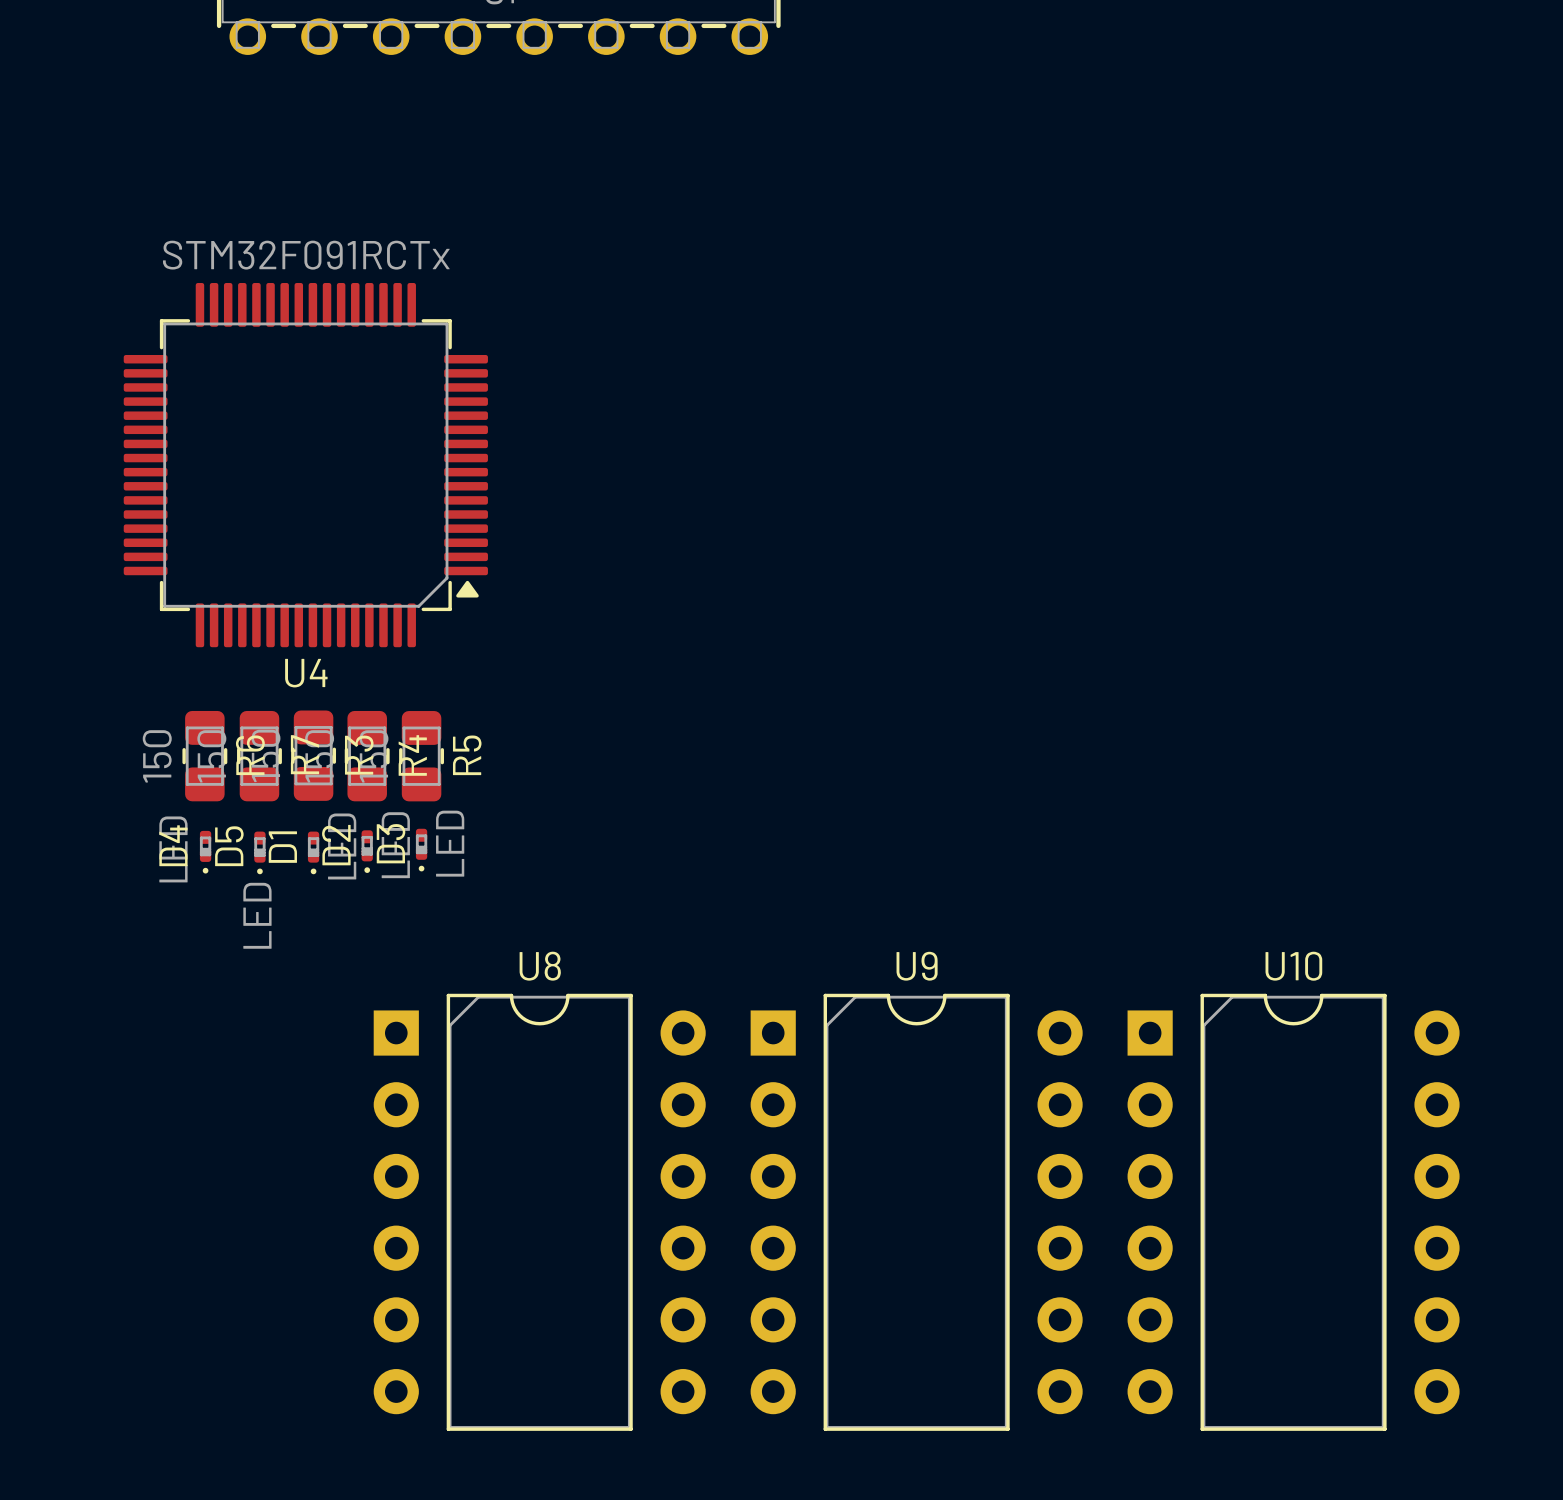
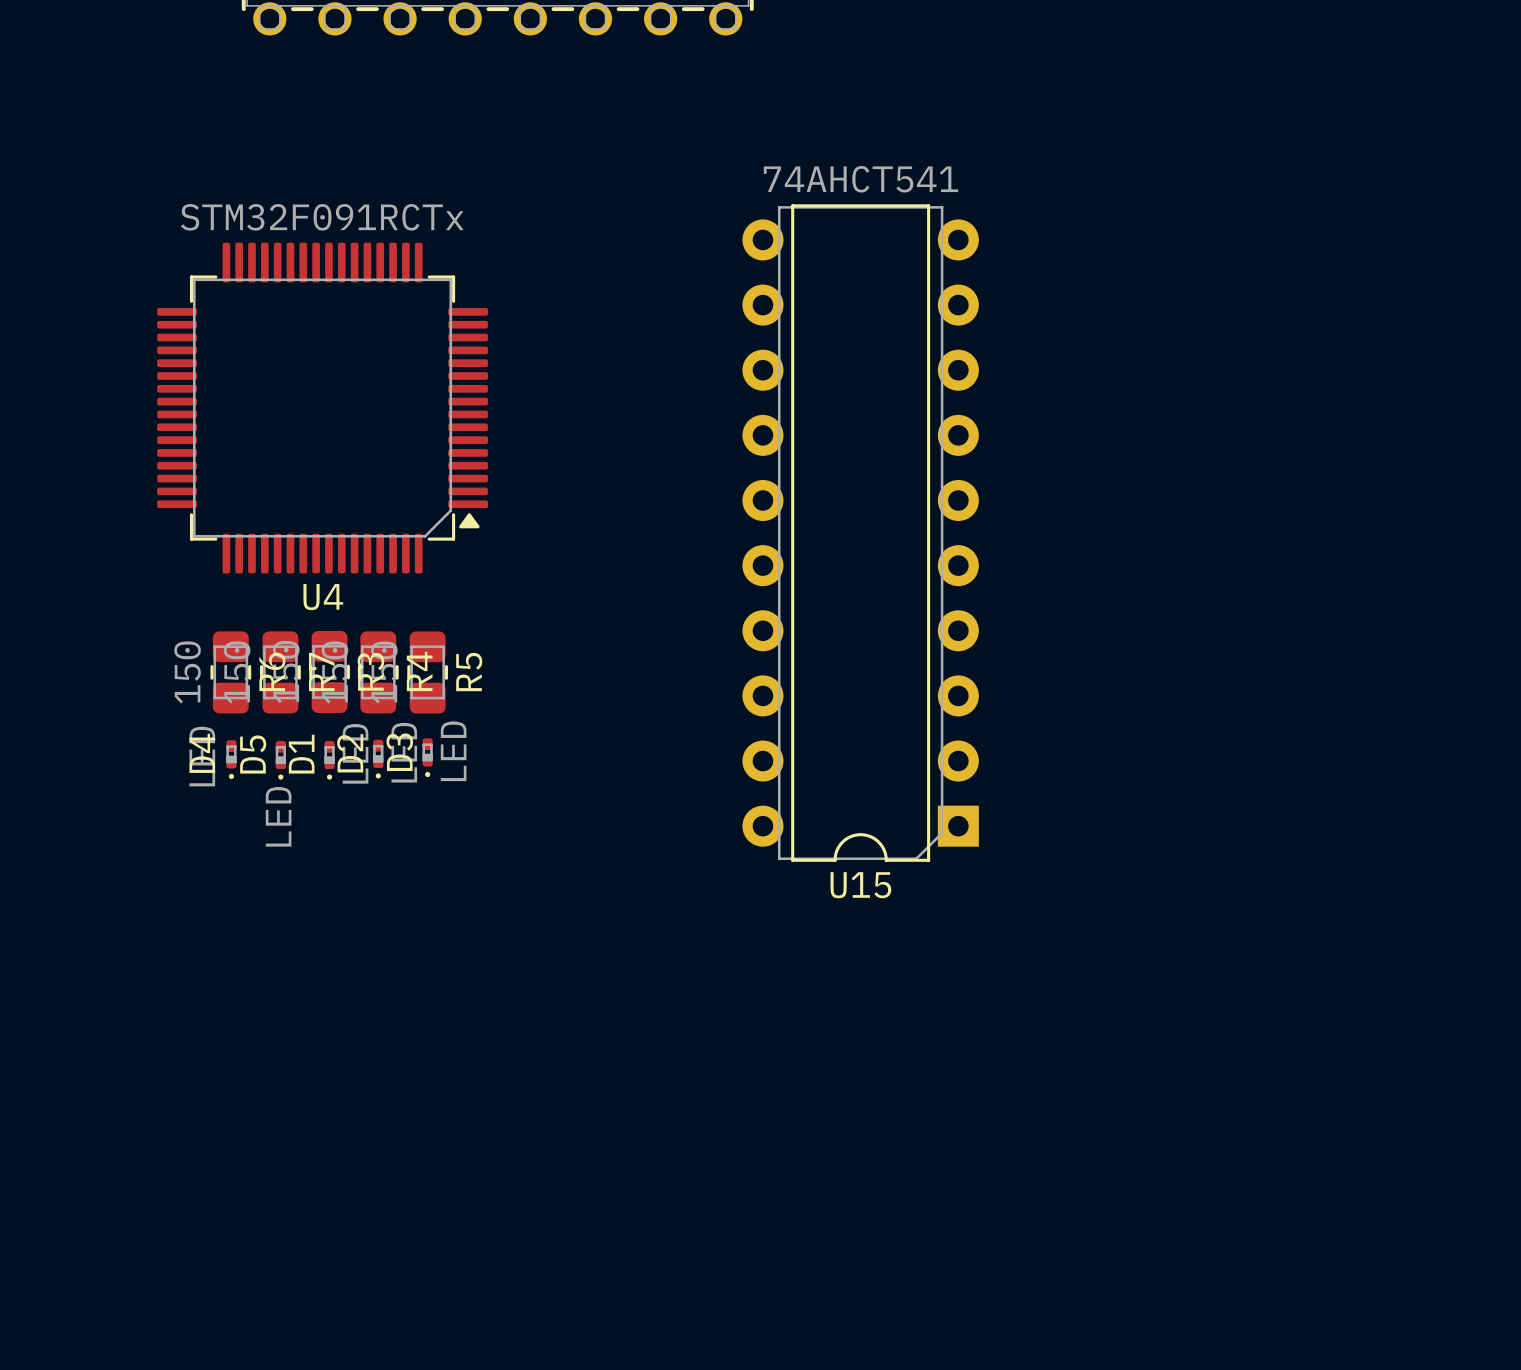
U15: none -> 74AHCT541 (860, 533)
U8: (539, 1212) -> none
U9: (916, 1212) -> none
U10: (1293, 1212) -> none

